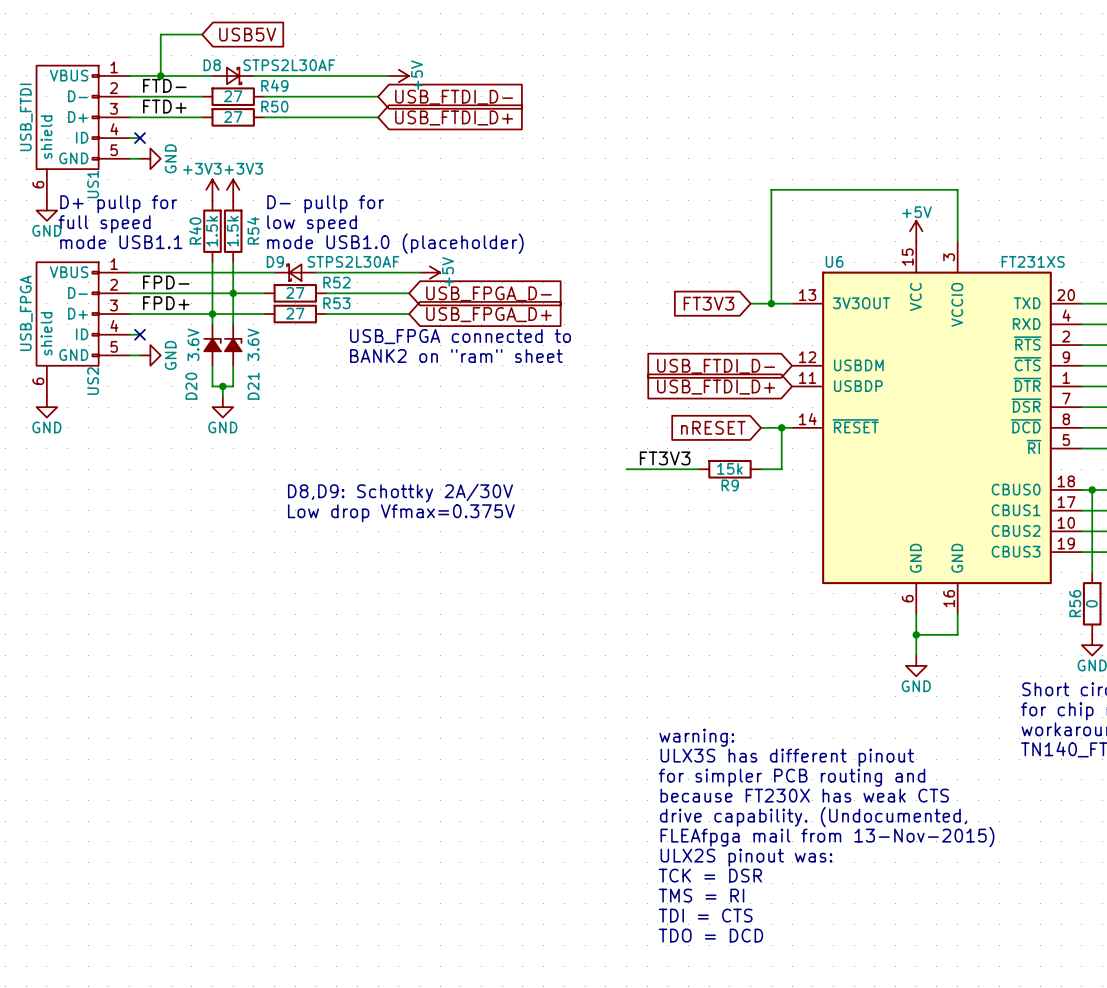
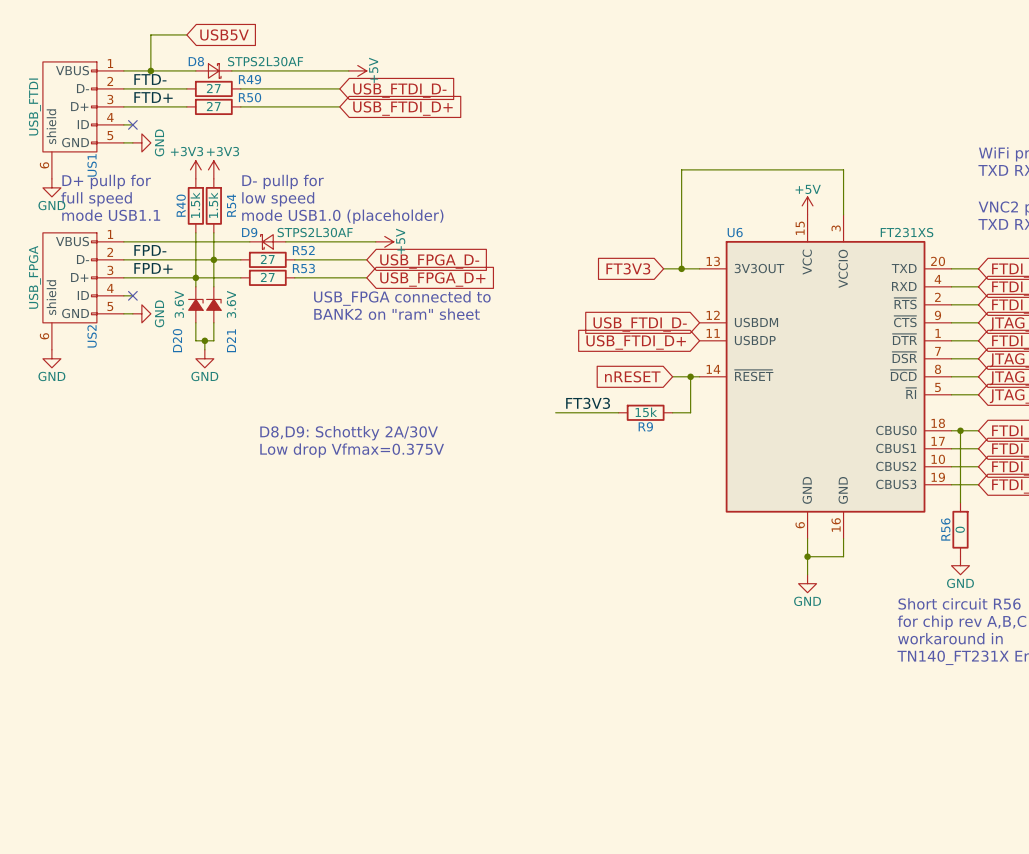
text: warning: (696, 737) -> none
text: ULX3S has different pinout (787, 757) -> none
text: for simpler PCB routing and (792, 777) -> none
text: because FT230X has weak CTS (804, 795) -> none
text: drive capability. (Undocumented, (813, 817) -> none
text: FLEAfpga mail from 13-Nov-2015) (827, 837) -> none
text: ULX2S pinout was: (746, 857) -> none
text: TCK = DSR (710, 875) -> none
text: TMS = RI (701, 895) -> none
text: TDI = CTS (705, 915) -> none
text: TDO = DCD (710, 935) -> none

